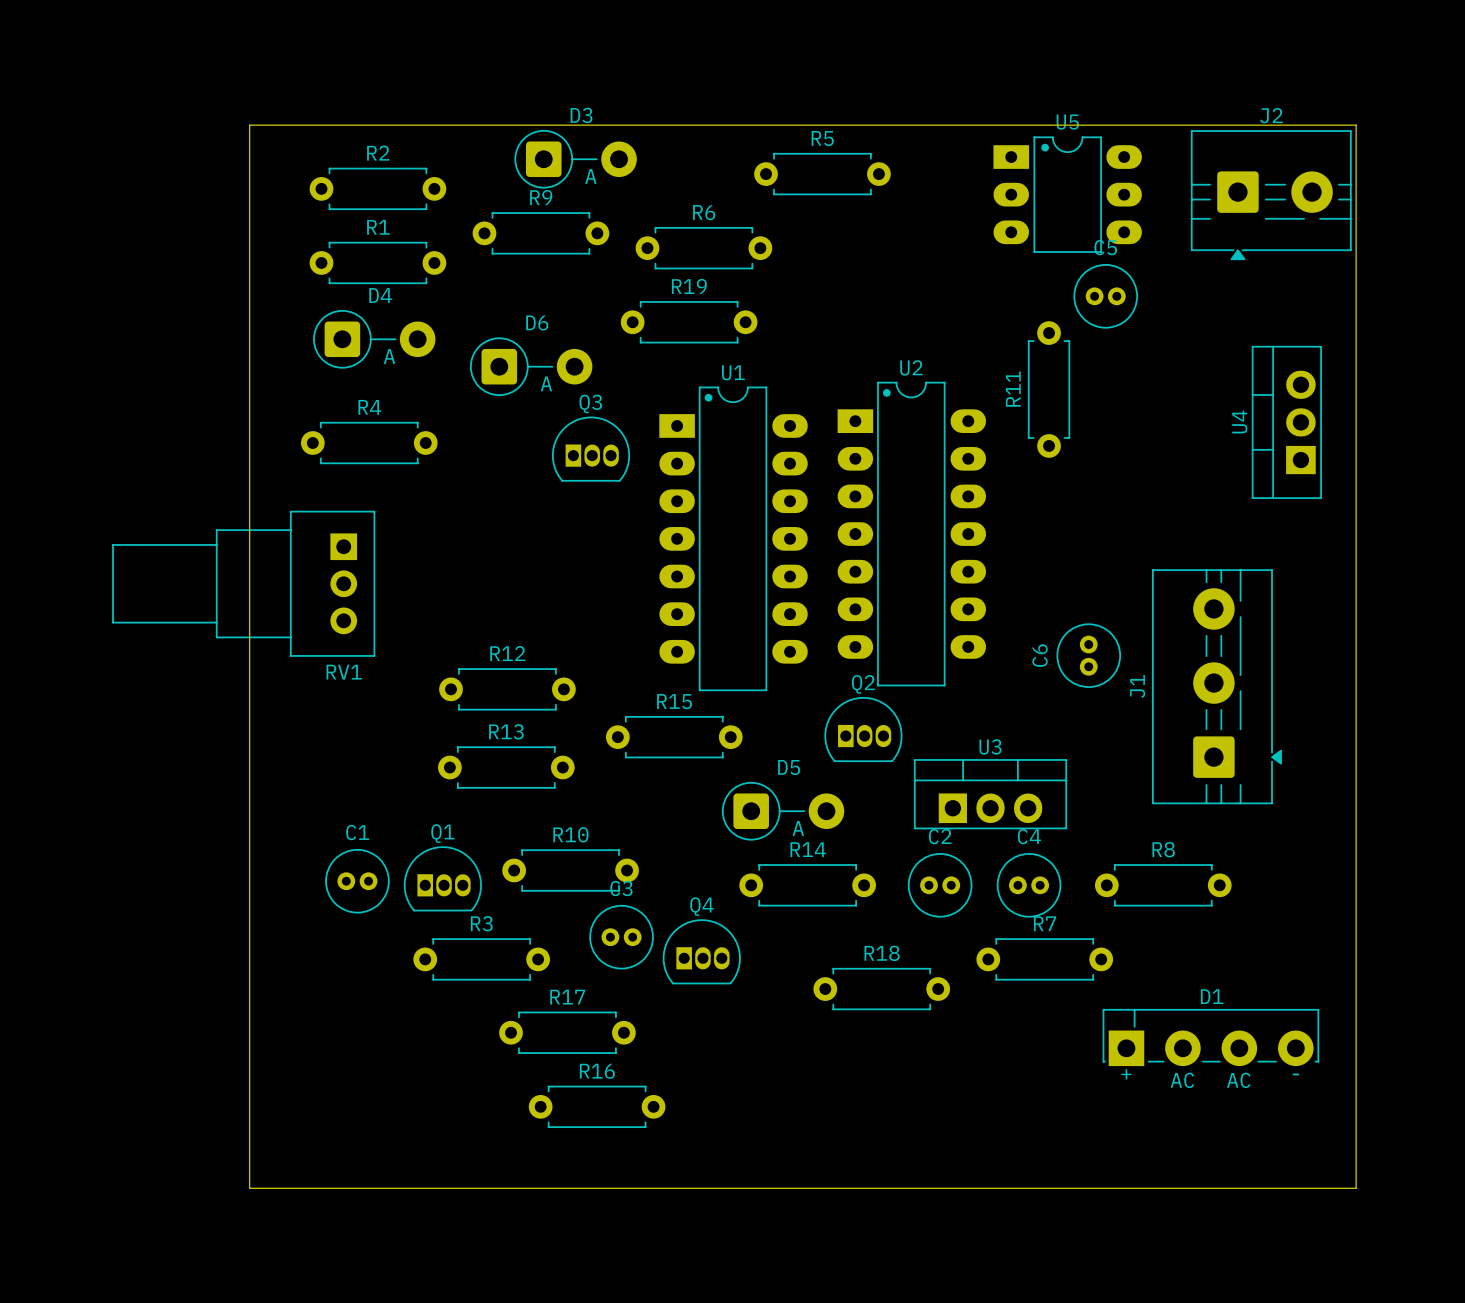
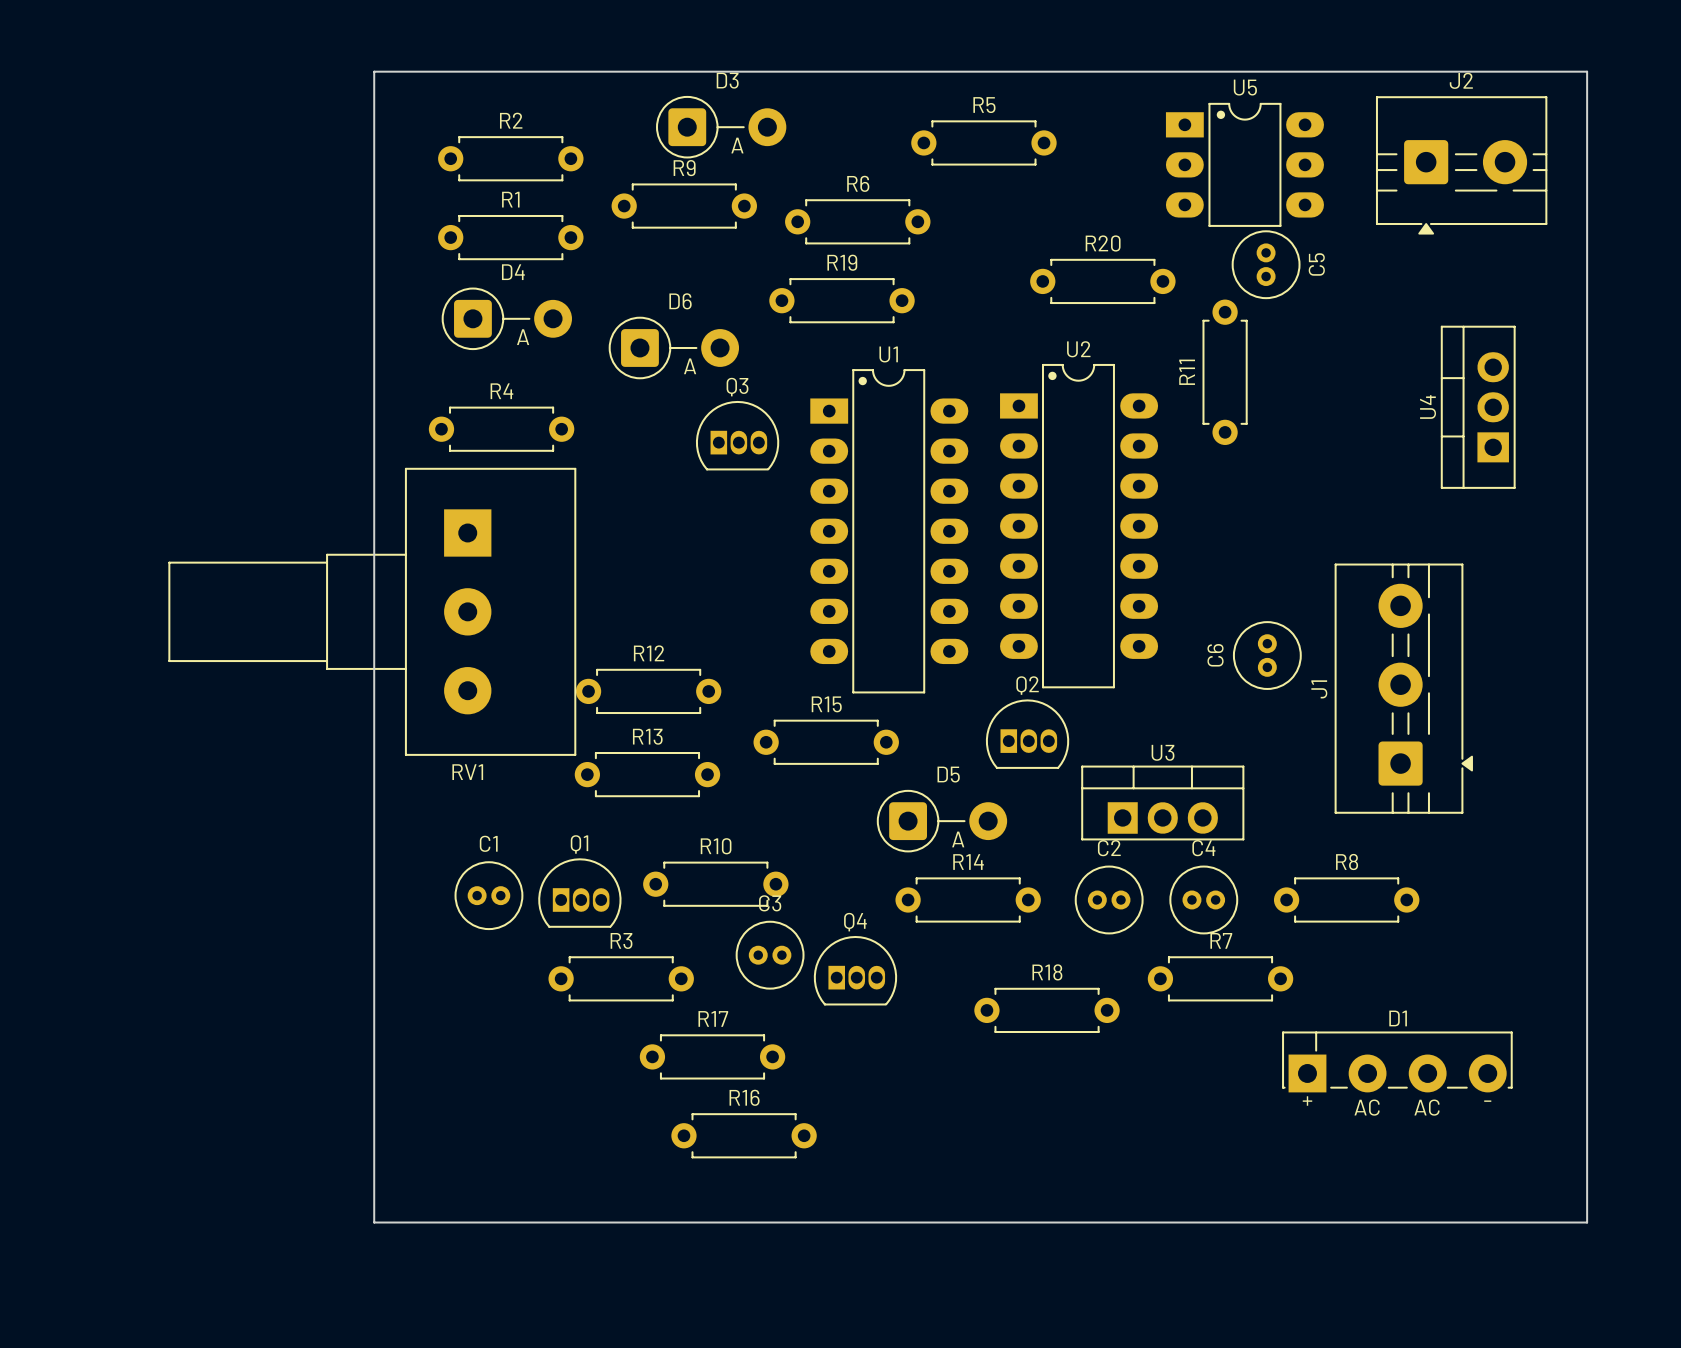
board edge: (249, 125) (1356, 125) (1356, 1188) -> (374, 90) (374, 71) (1587, 71) (1587, 1222) (1551, 1222)
C5 rotation: 0° (1105, 296) -> 90° clockwise (1266, 264)
R20: none -> (1102, 281)
RV1 footprint: [112, 510, 376, 657] -> [168, 467, 577, 756]
RV1 name position: RV1 (344, 672) -> RV1 (467, 772)

